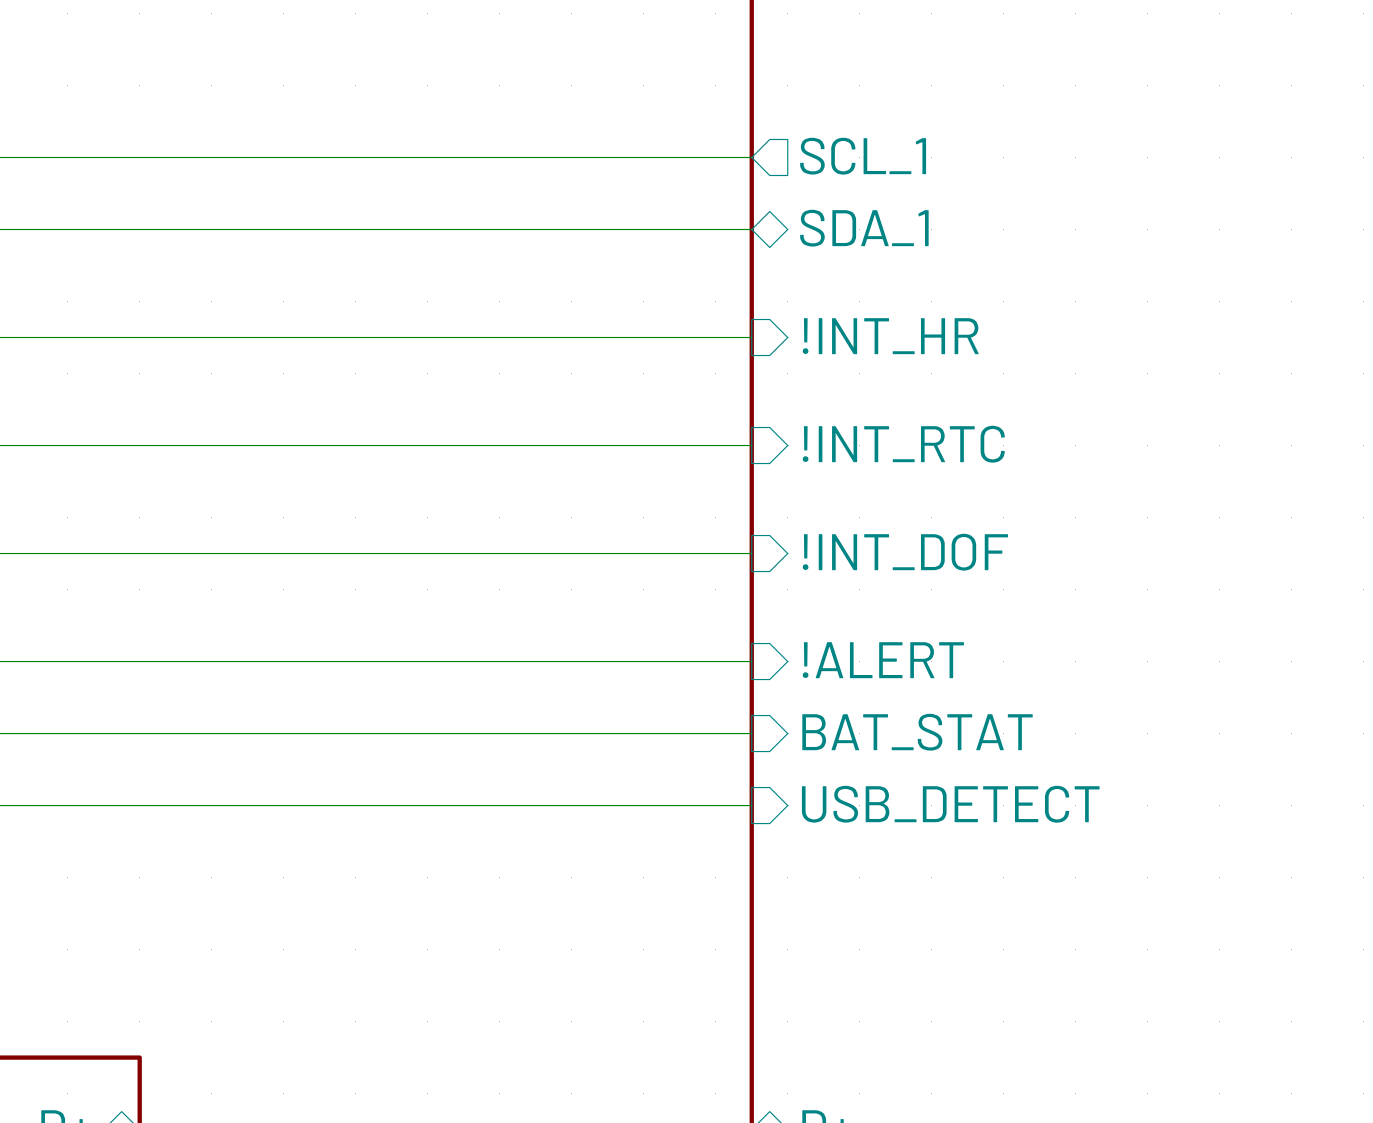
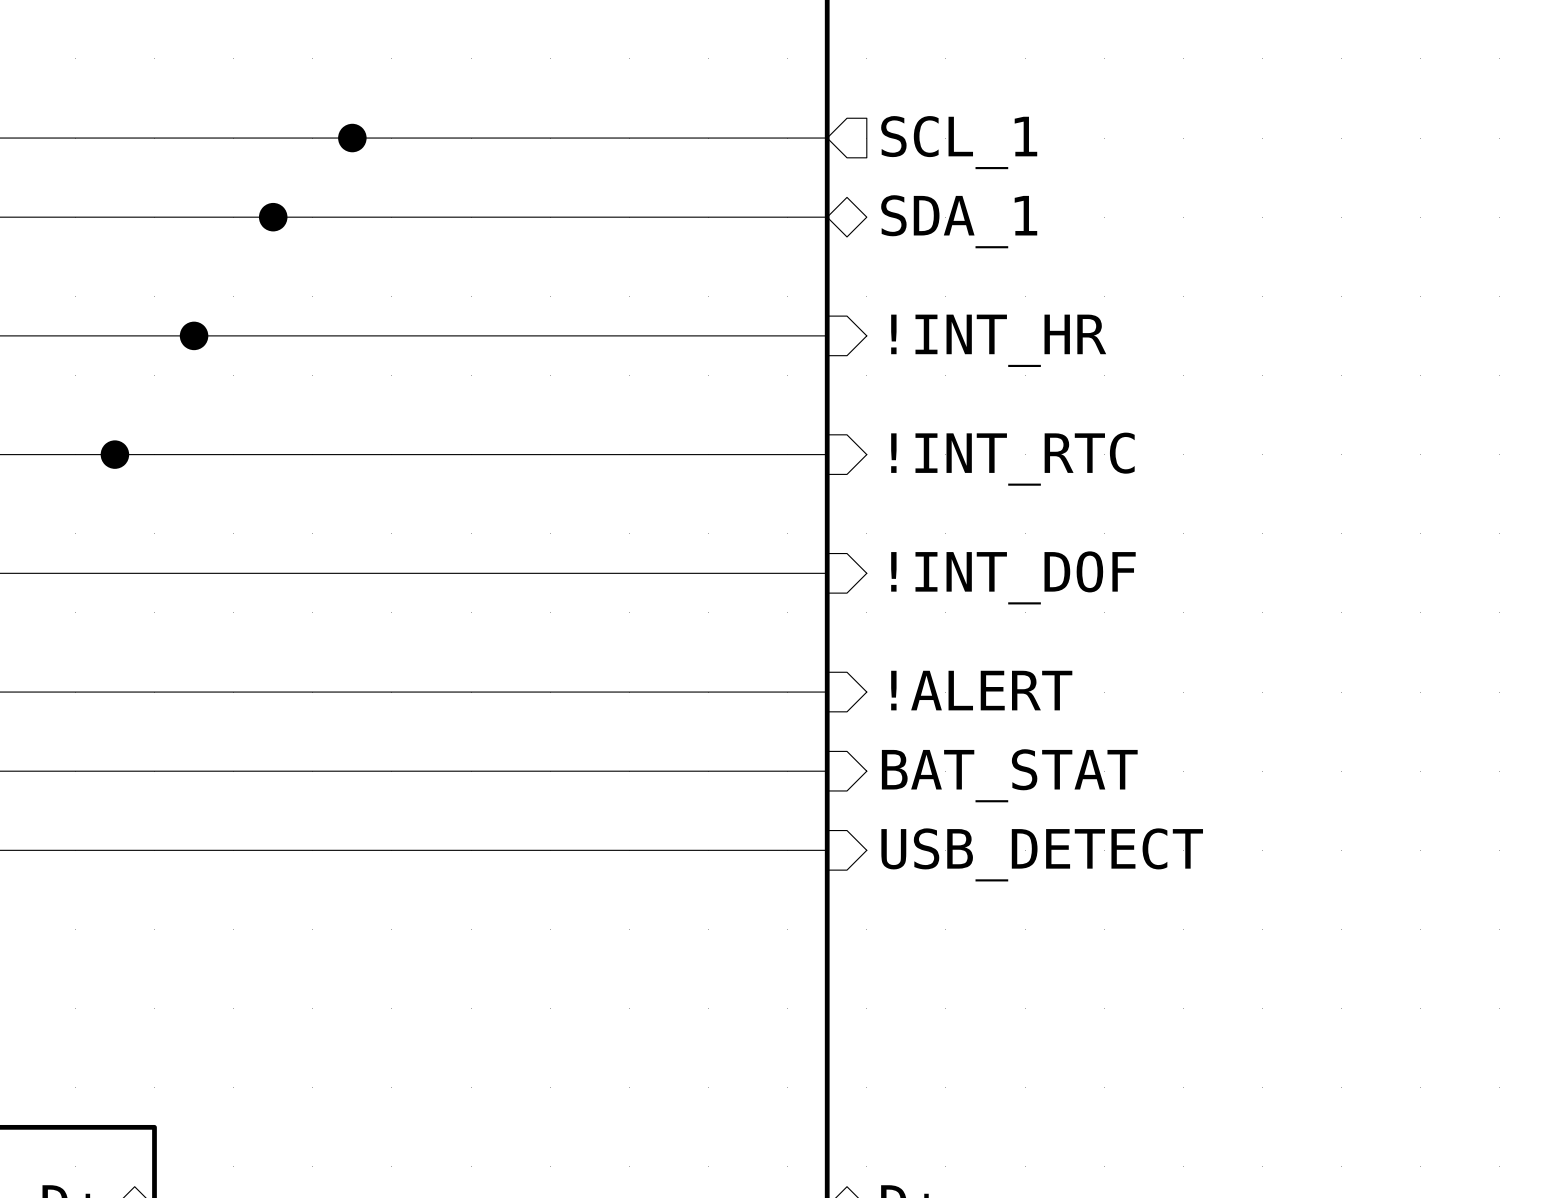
junction: none -> (352, 138)
junction: none -> (273, 217)
junction: none -> (194, 335)
junction: none -> (114, 454)

